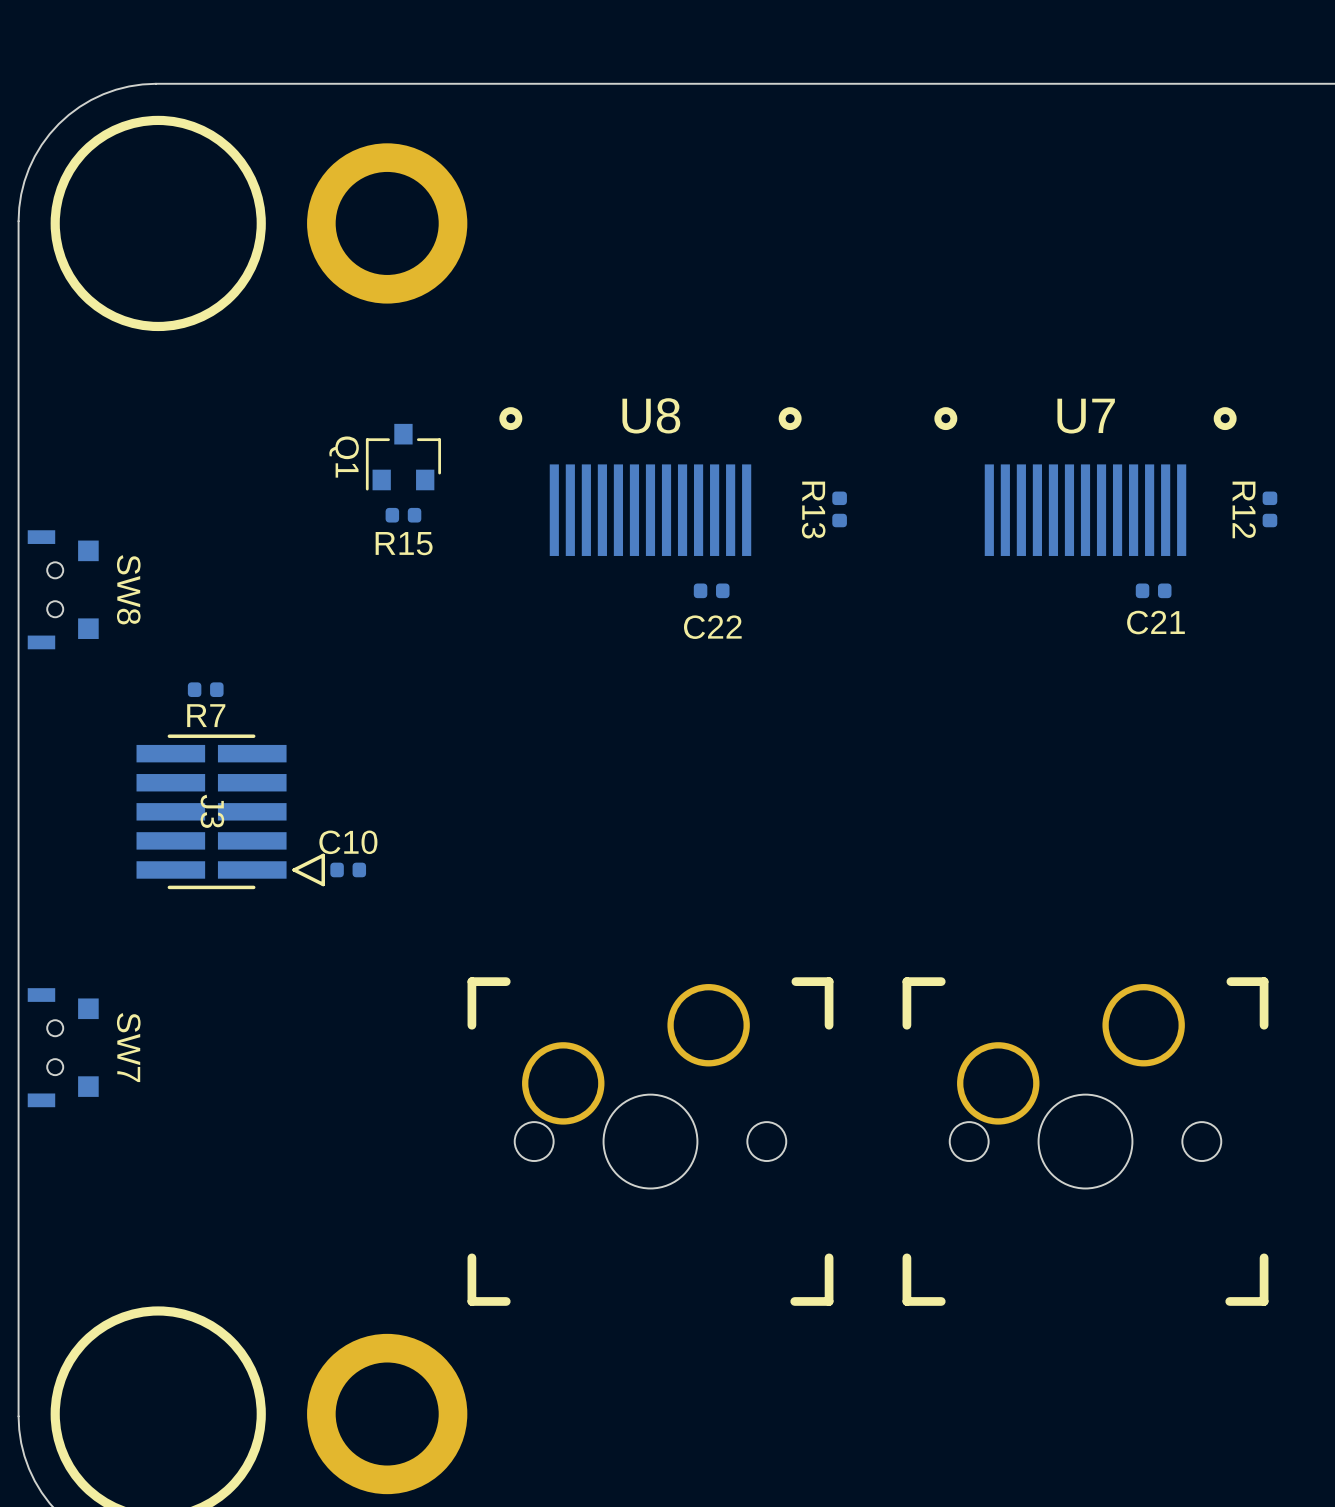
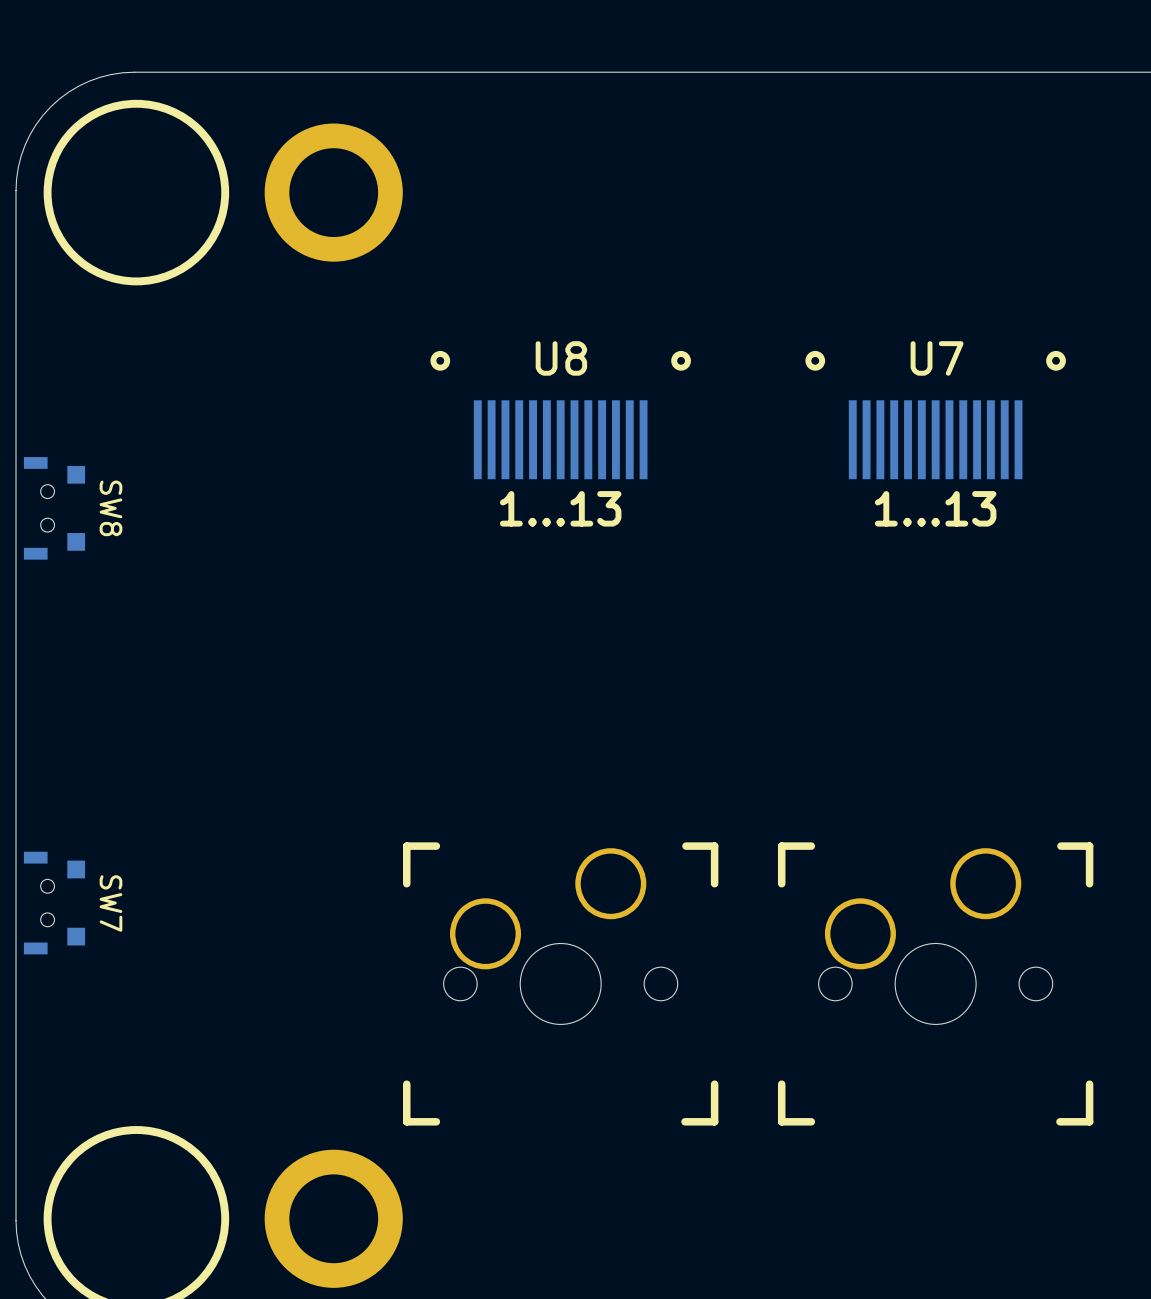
Q1: (403, 457) -> none
R13: (839, 509) -> none
R12: (1269, 509) -> none
R15: (403, 515) -> none
U8 text: none -> 1...13 (560, 508)
C22: (711, 590) -> none
U7 text: none -> 1...13 (935, 508)
C21: (1153, 590) -> none
R7: (205, 689) -> none
J3: (230, 811) -> none
C10: (348, 869) -> none

